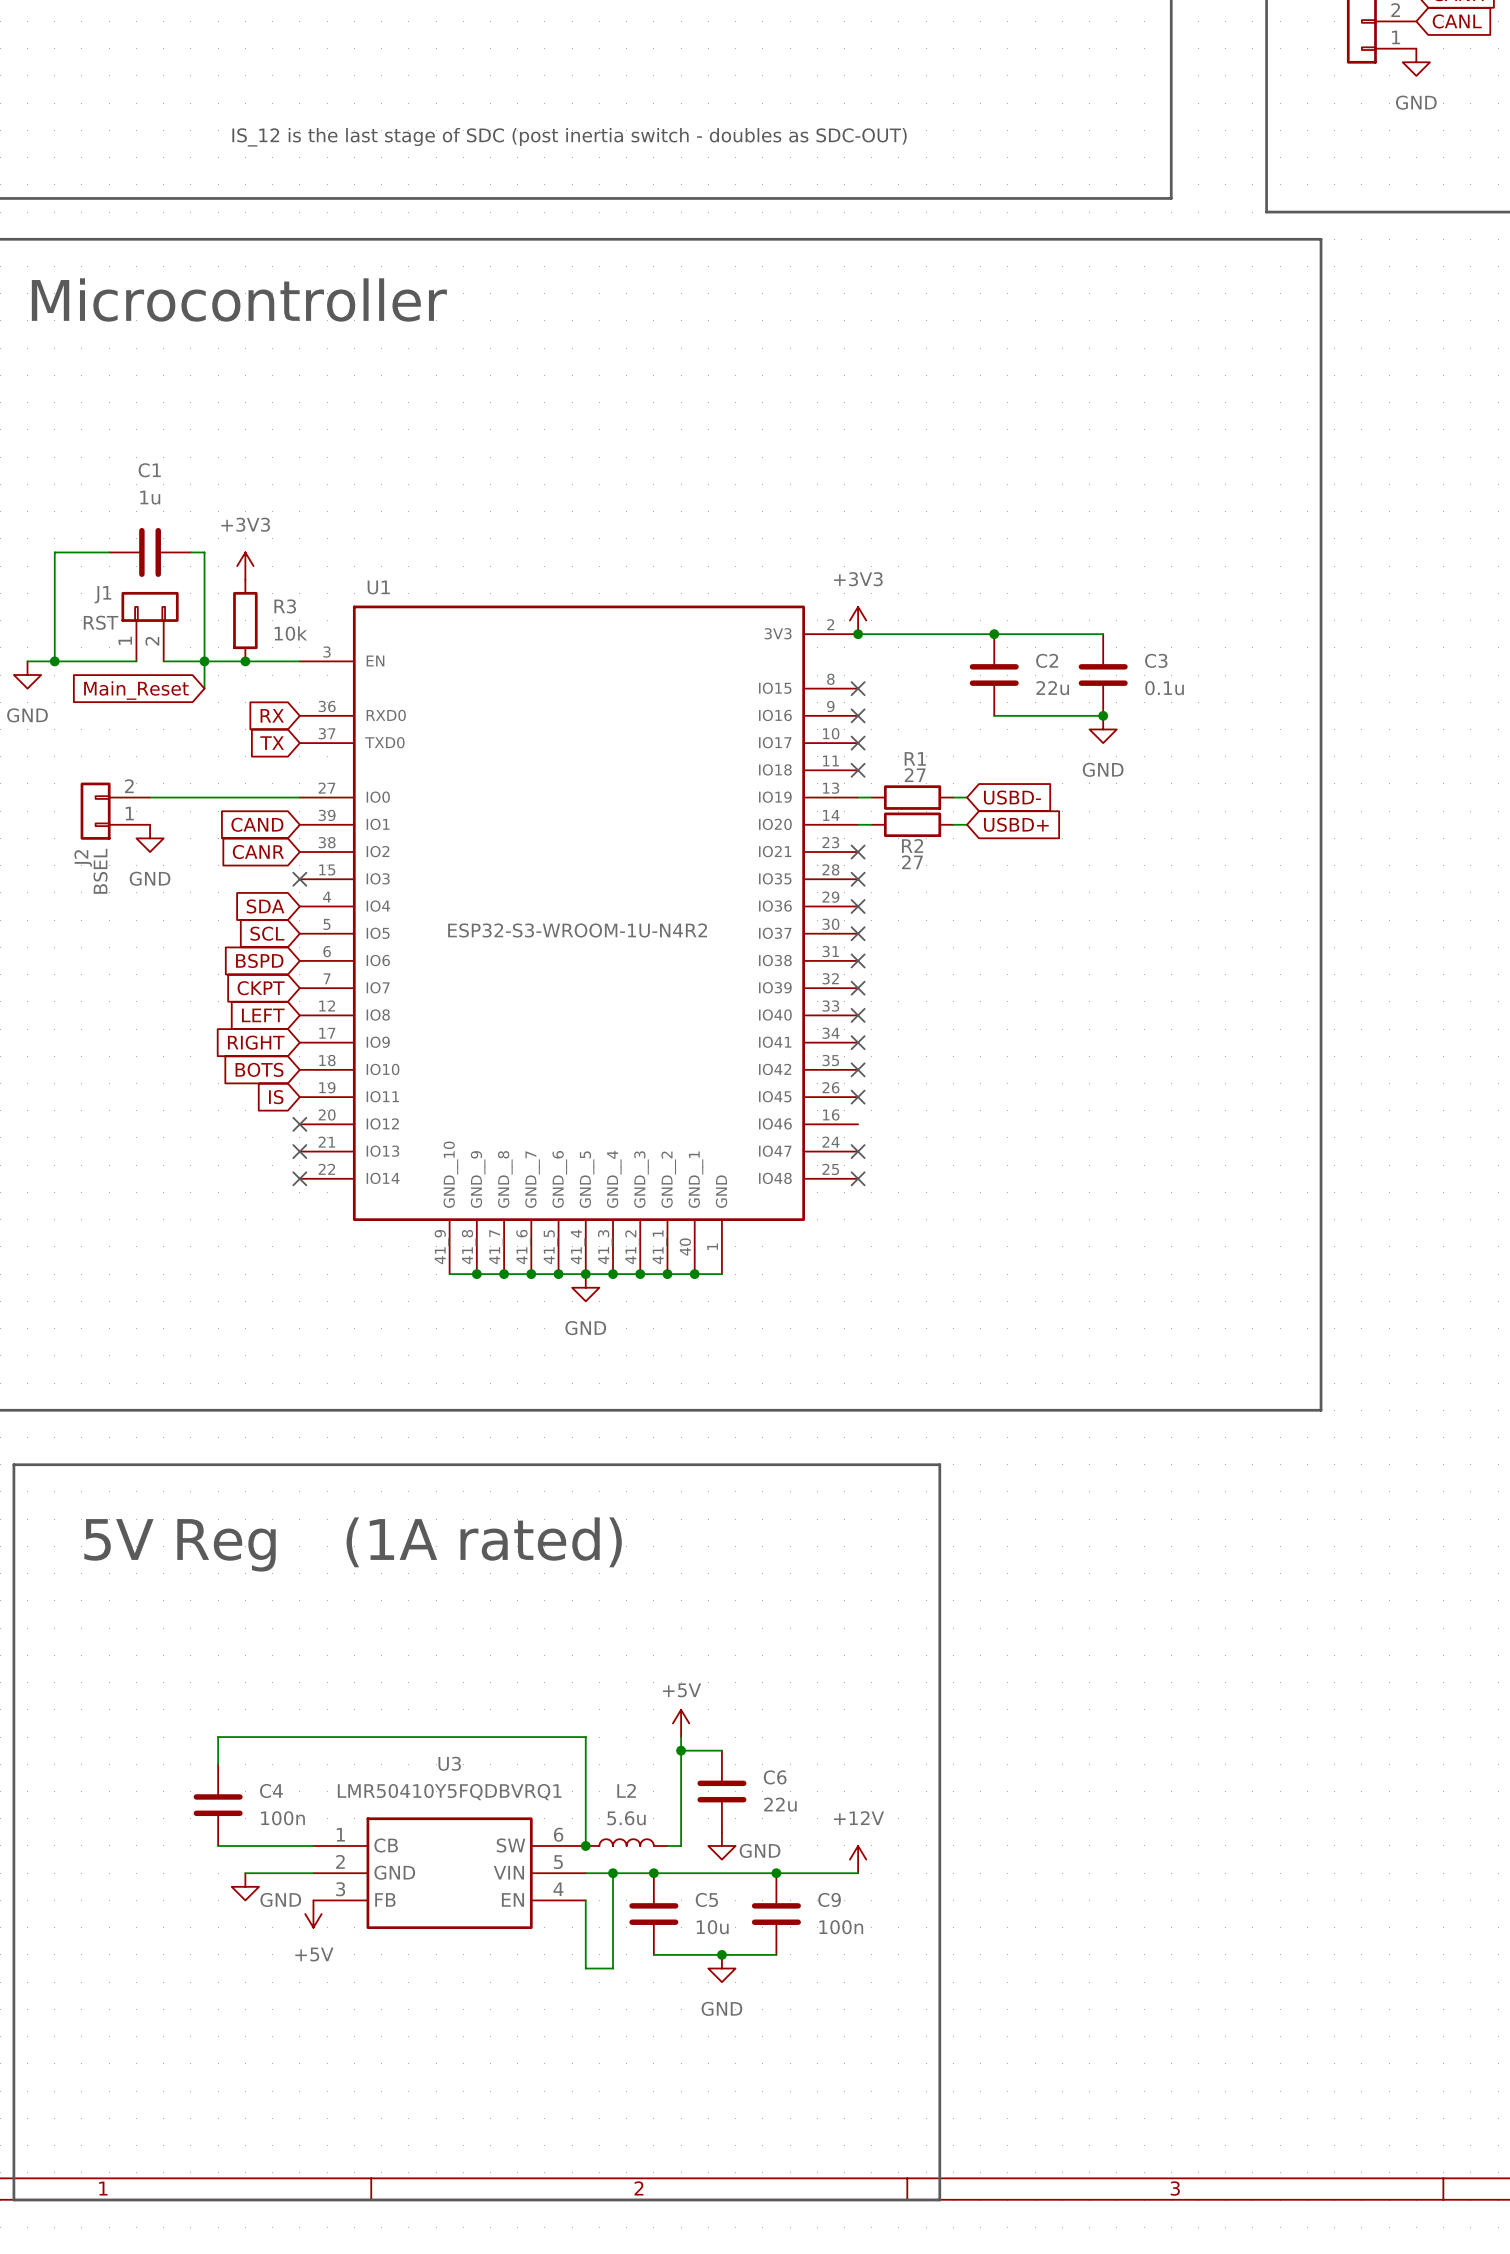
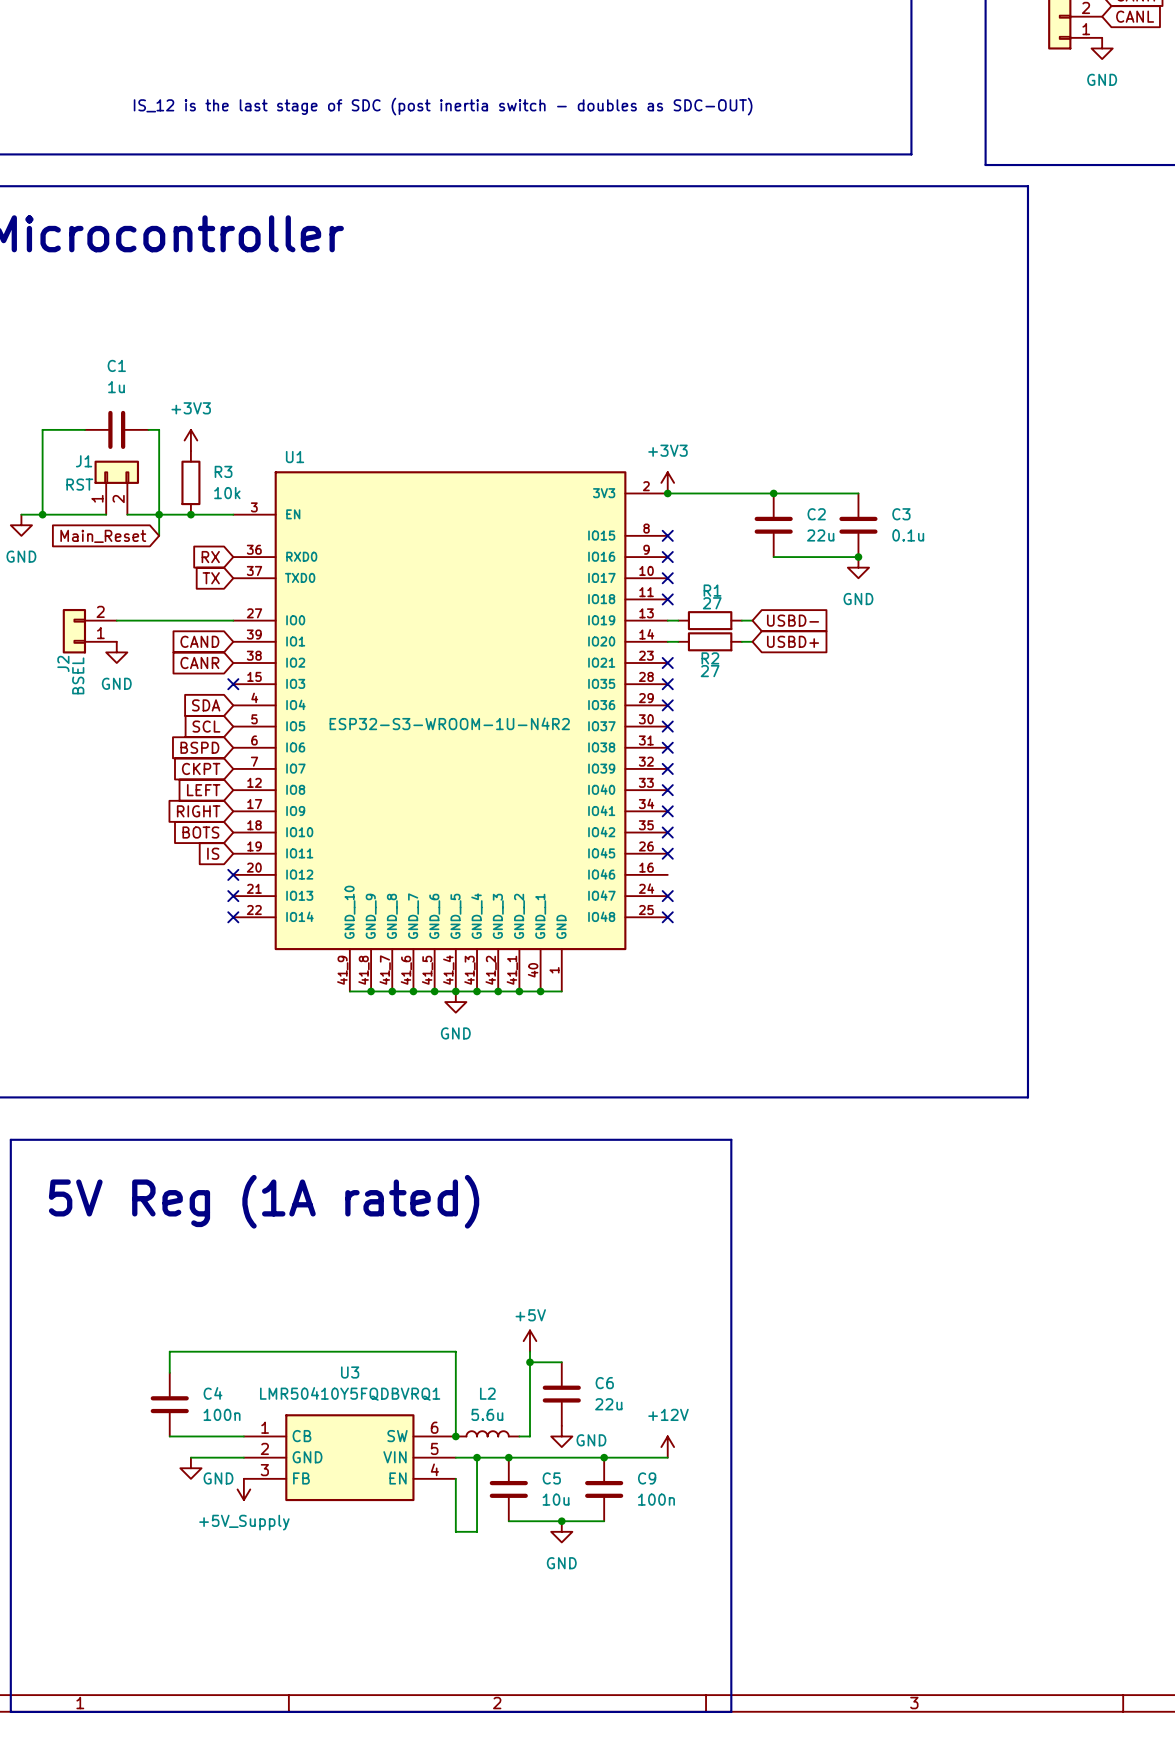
power symbol: +5V (313, 1914) -> +5V_Supply (243, 1489)

